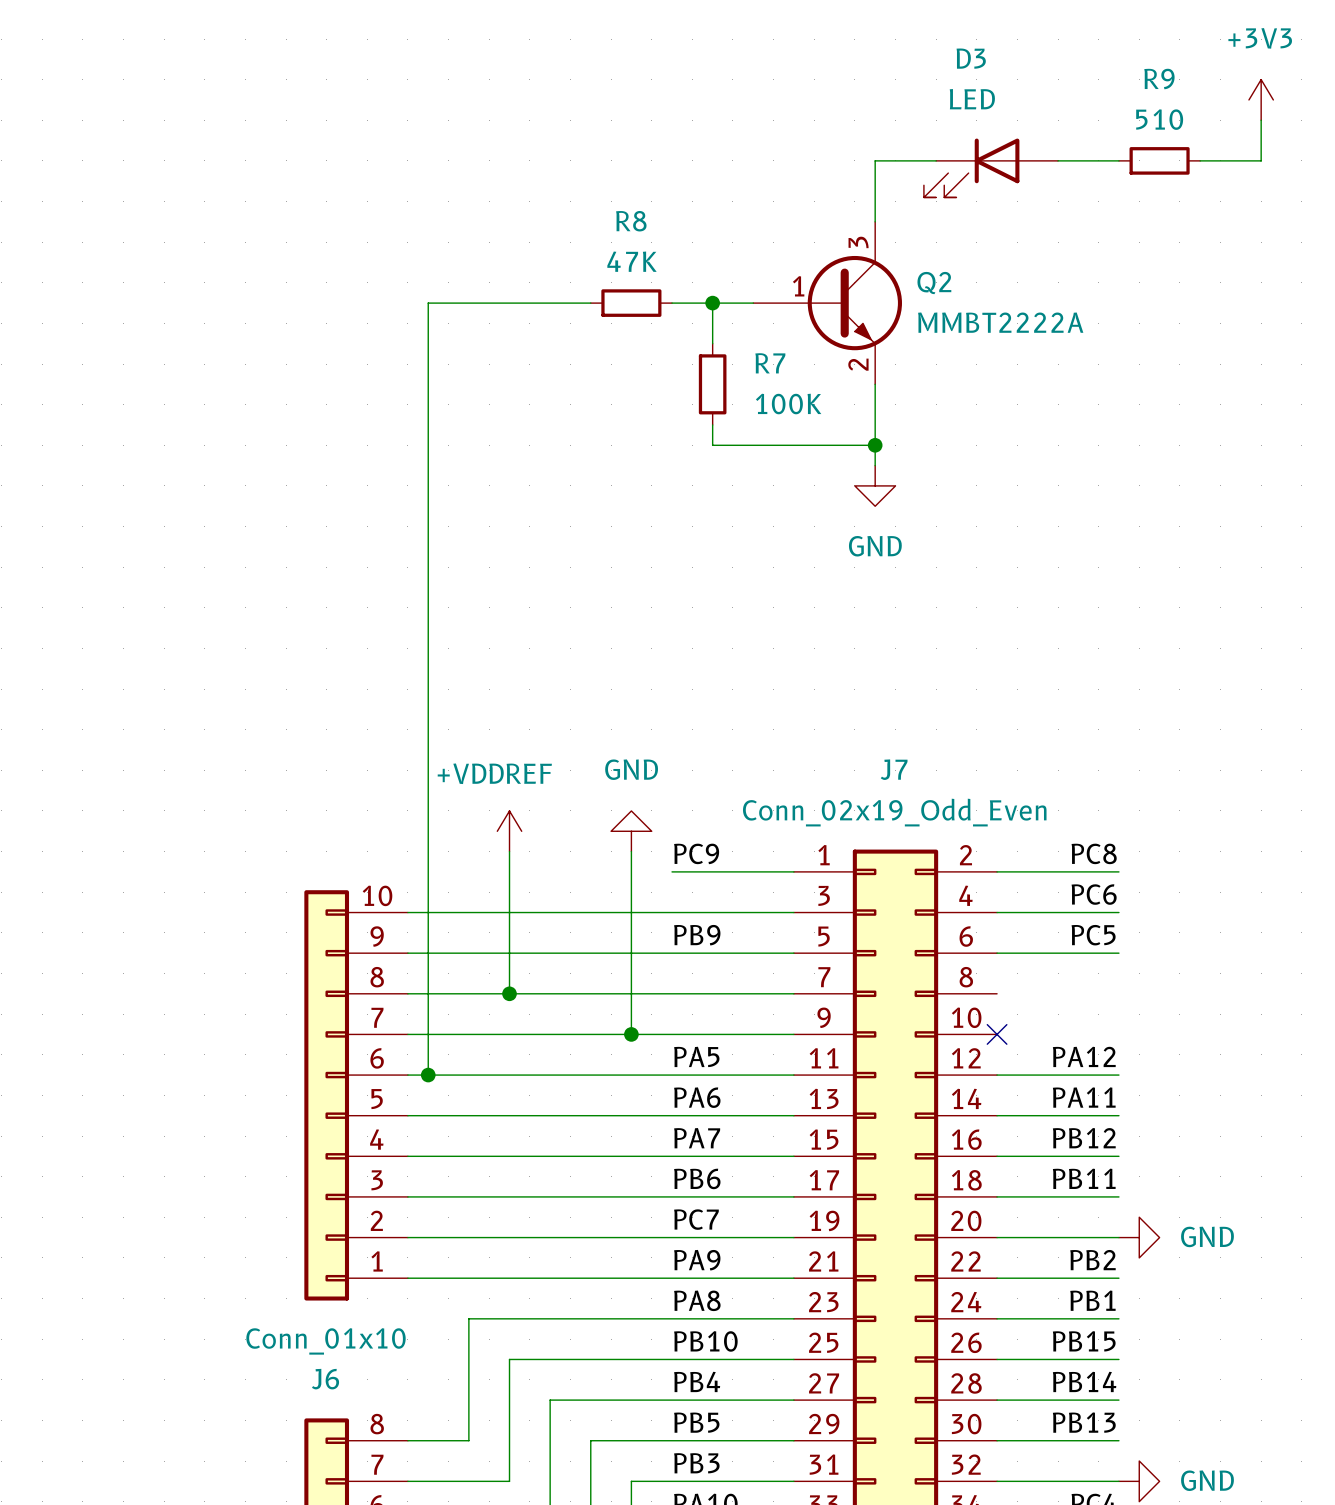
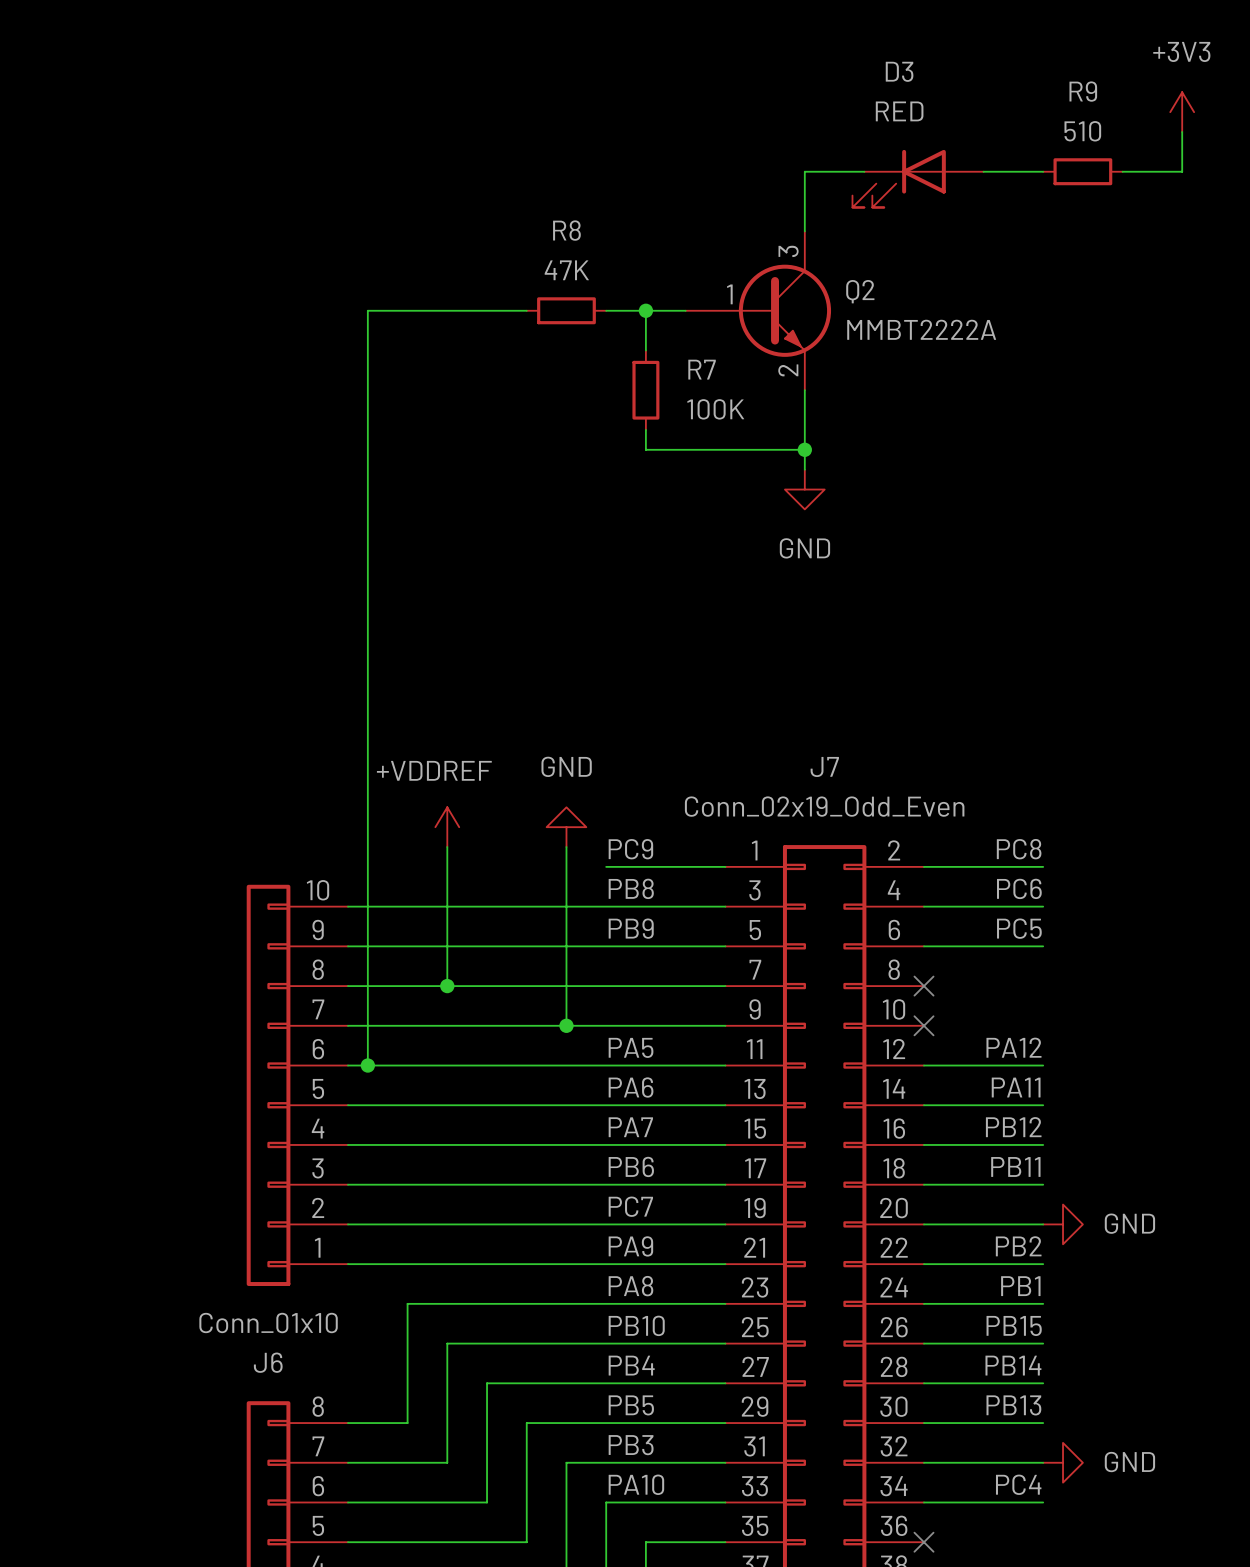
D3 value: LED (972, 99) -> RED (899, 111)
label: none -> PB8 (631, 888)
no-connect mark: none -> (923, 986)

